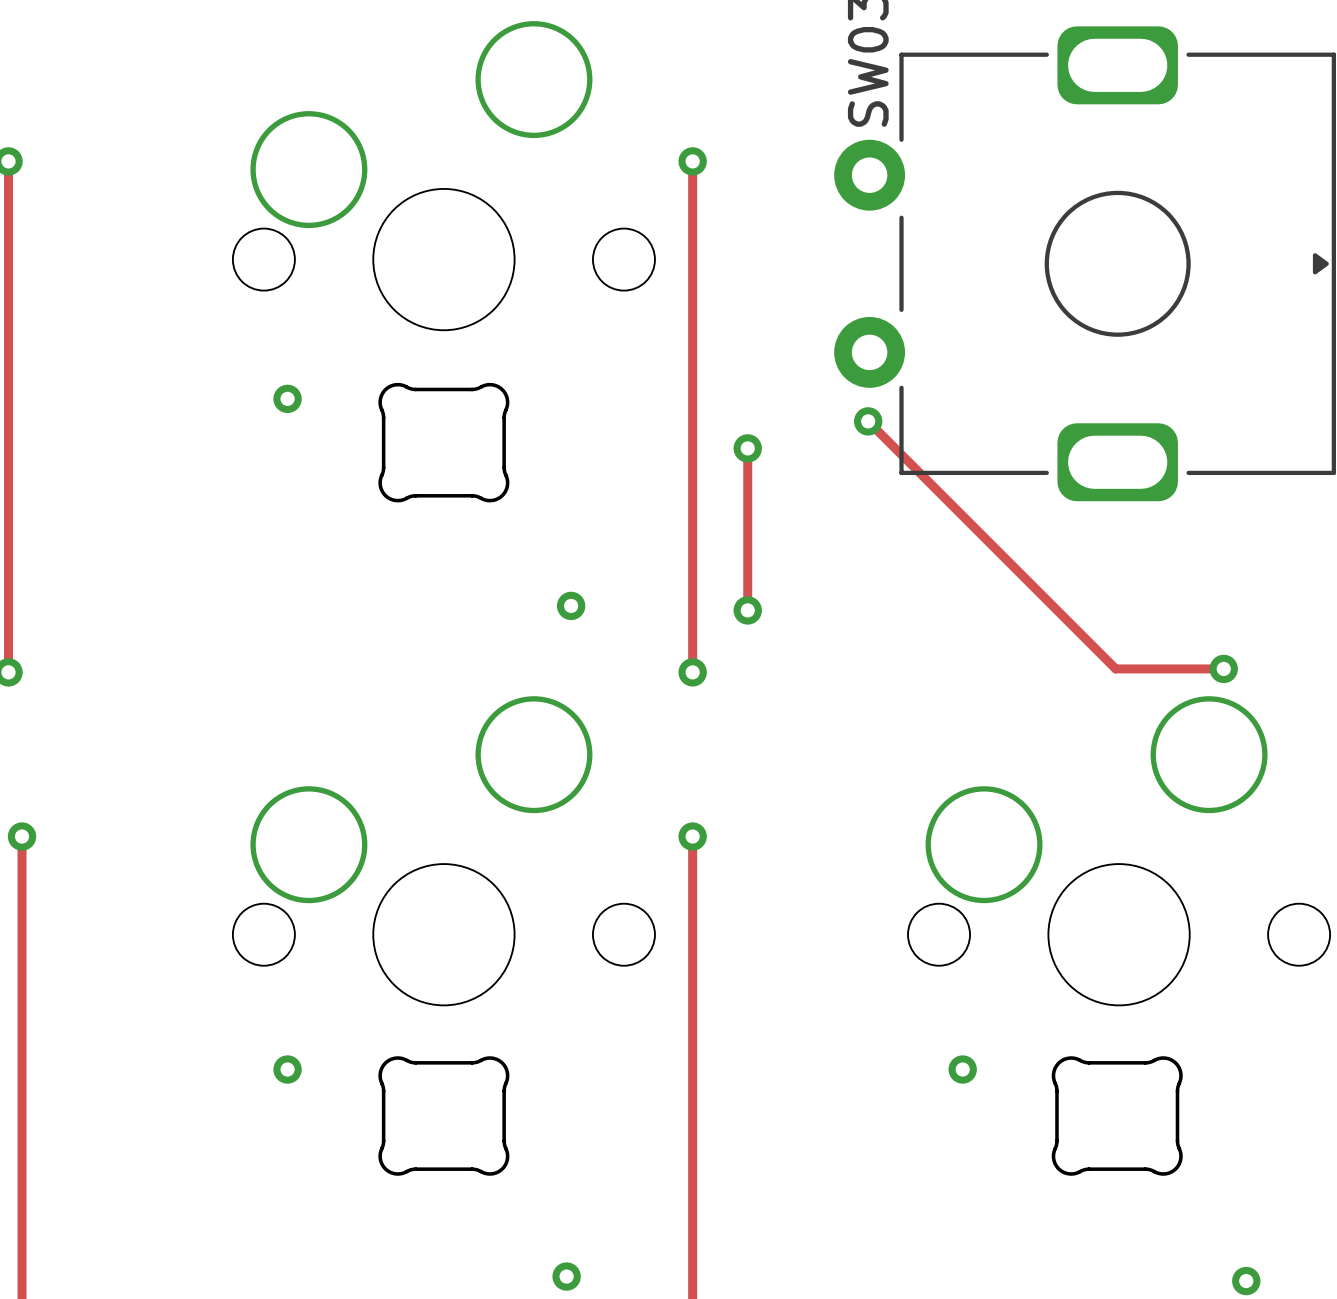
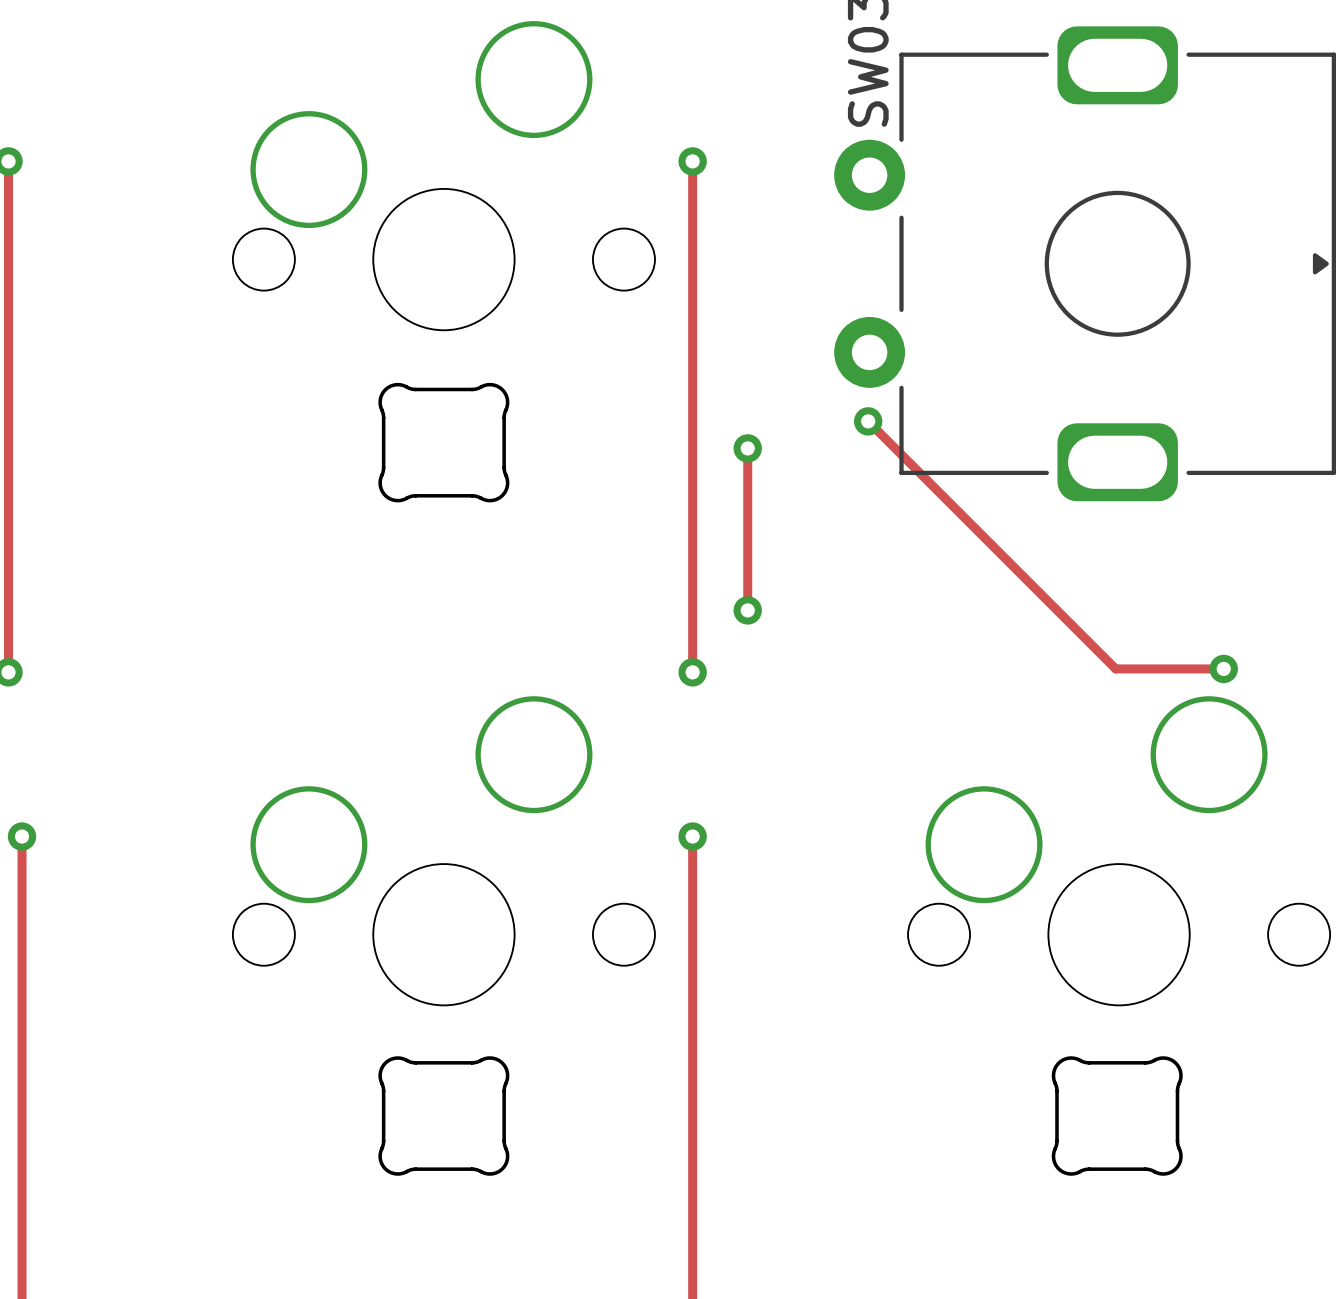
via: (287, 398) -> none
via: (571, 605) -> none
via: (287, 1069) -> none
via: (962, 1069) -> none
via: (566, 1276) -> none
via: (1246, 1281) -> none

